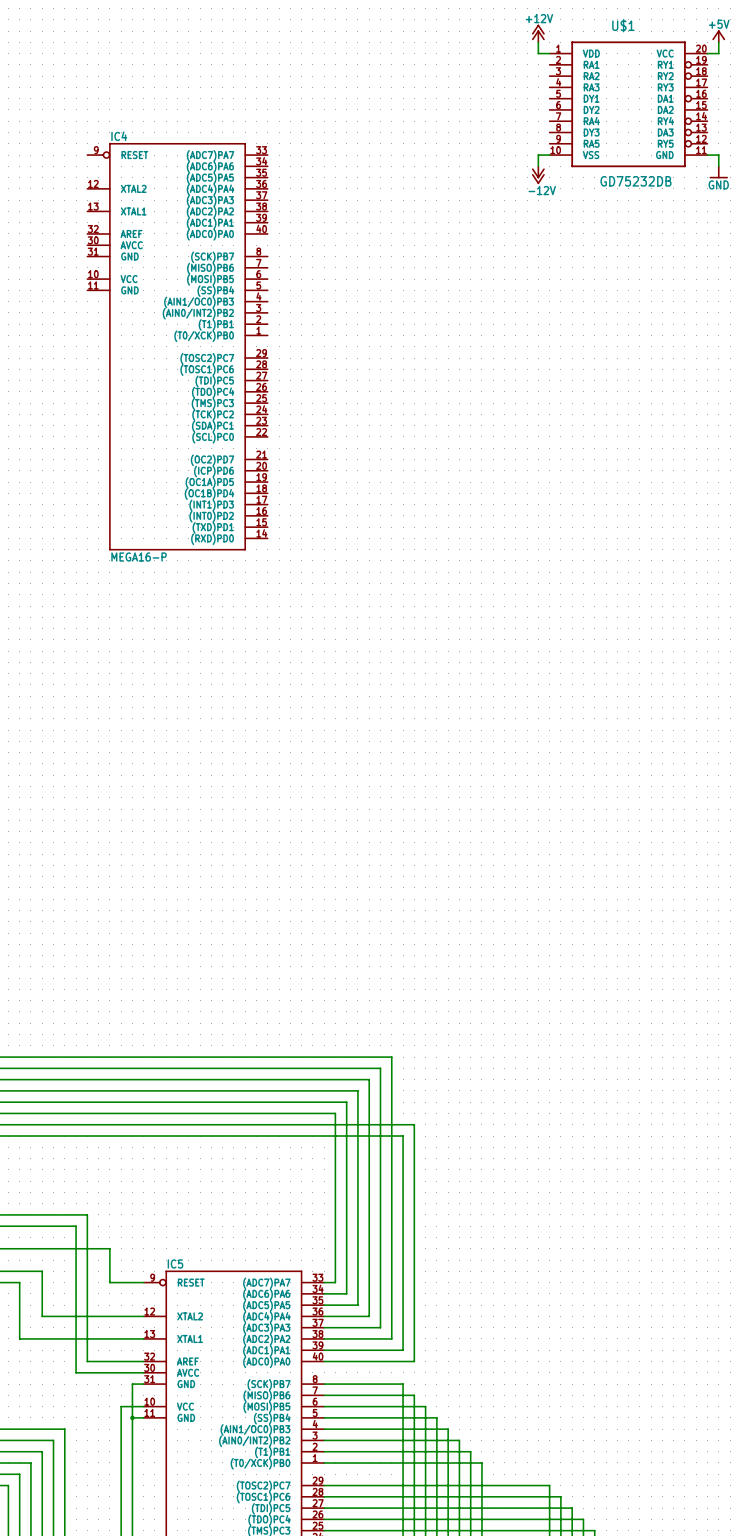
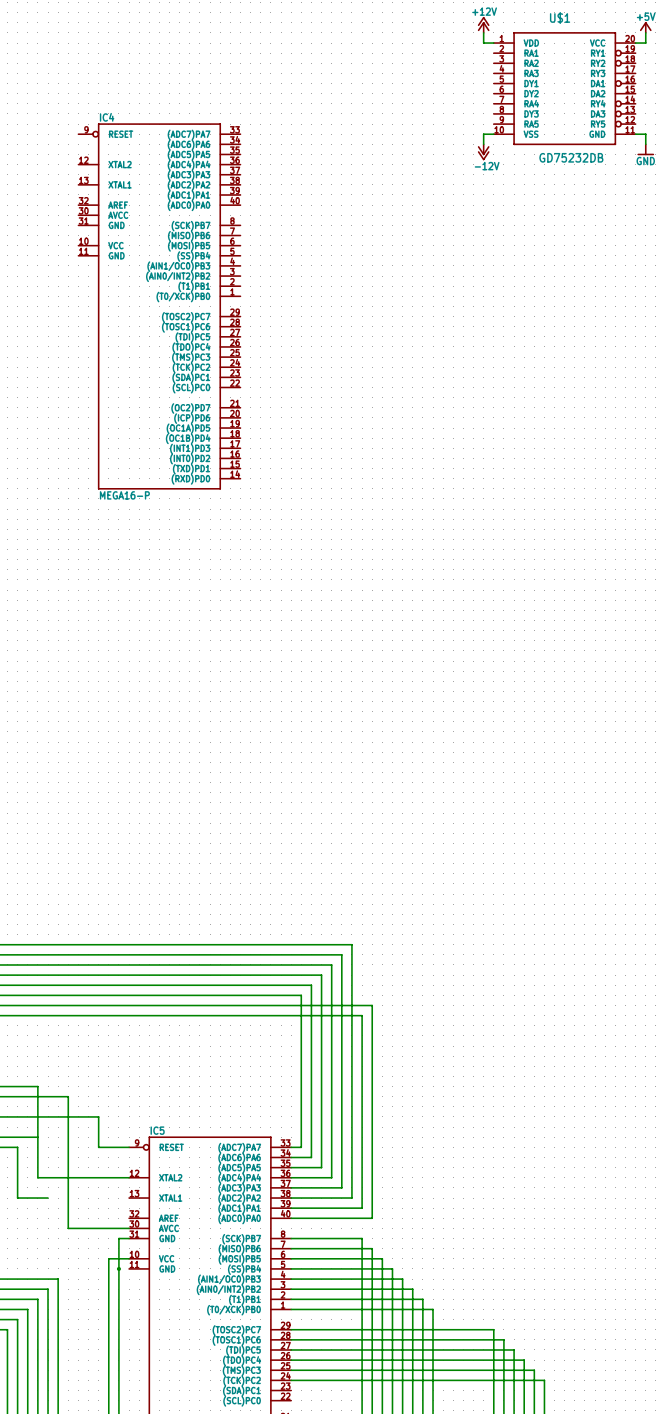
wire: (42, 1214) (87, 1214) (87, 1361) (143, 1361) -> (37, 1086) (37, 1137)
wire: (53, 1338) (143, 1338) -> none
wire: (132, 1417) (143, 1417) -> none

